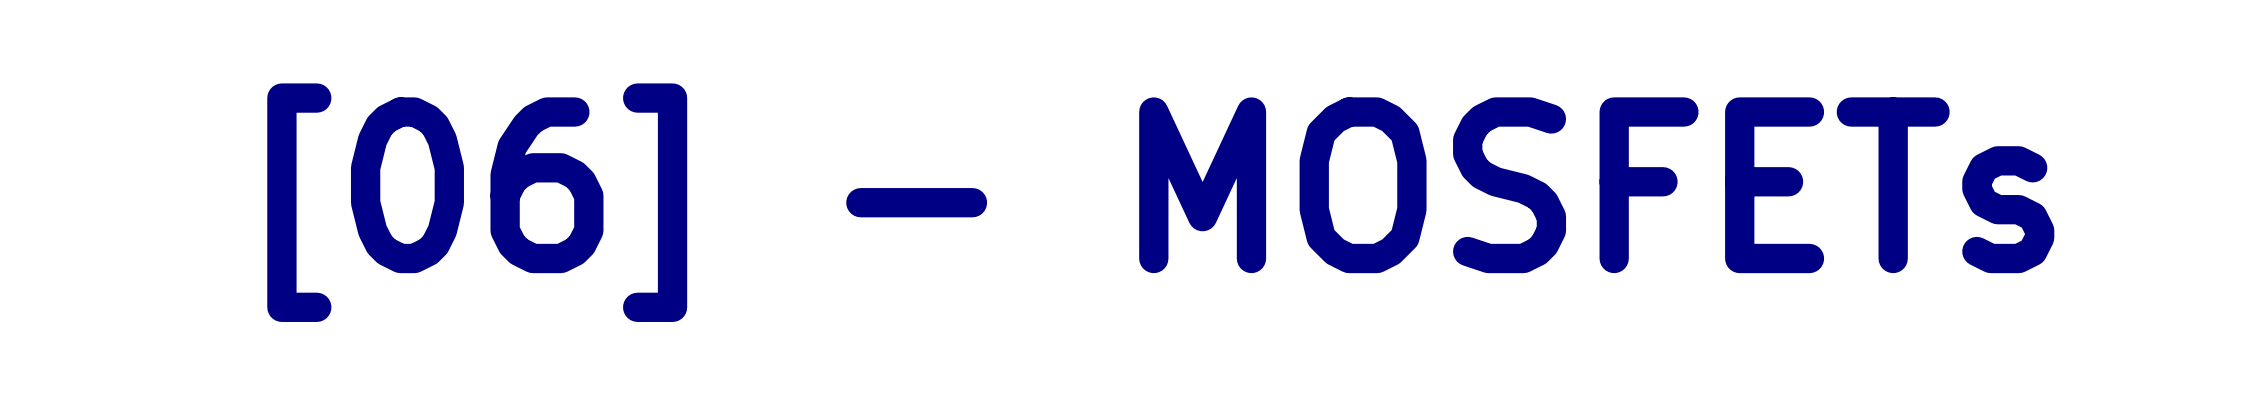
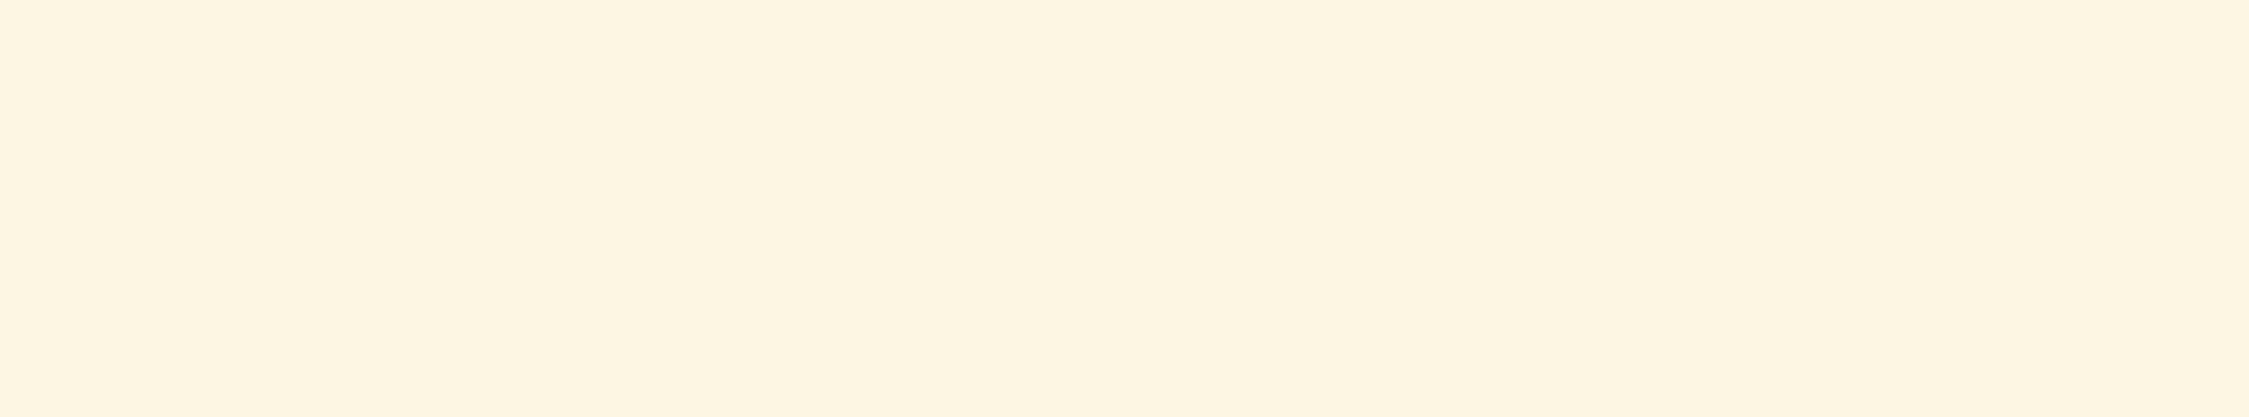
text: [06] - MOSFETs (1160, 202) -> none

